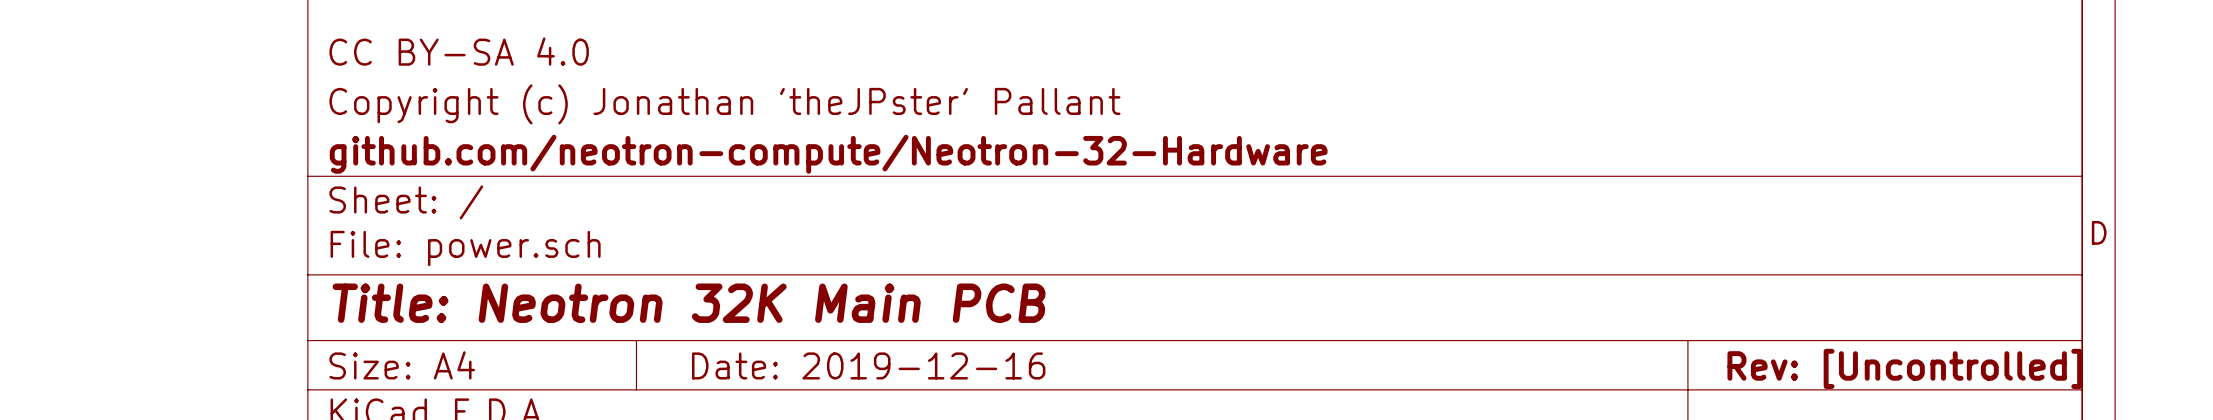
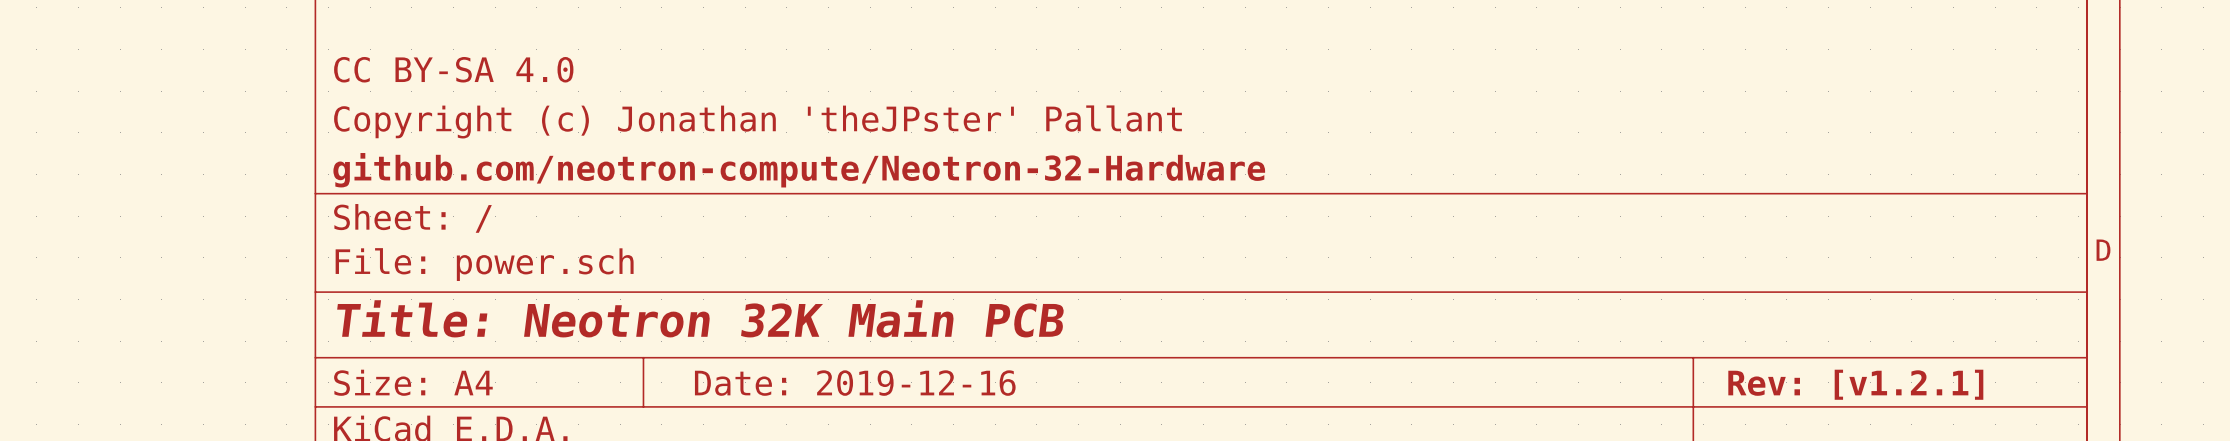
title block: Rev: [Uncontrolled] (1904, 368) -> Rev: [v1.2.1] (1855, 384)

